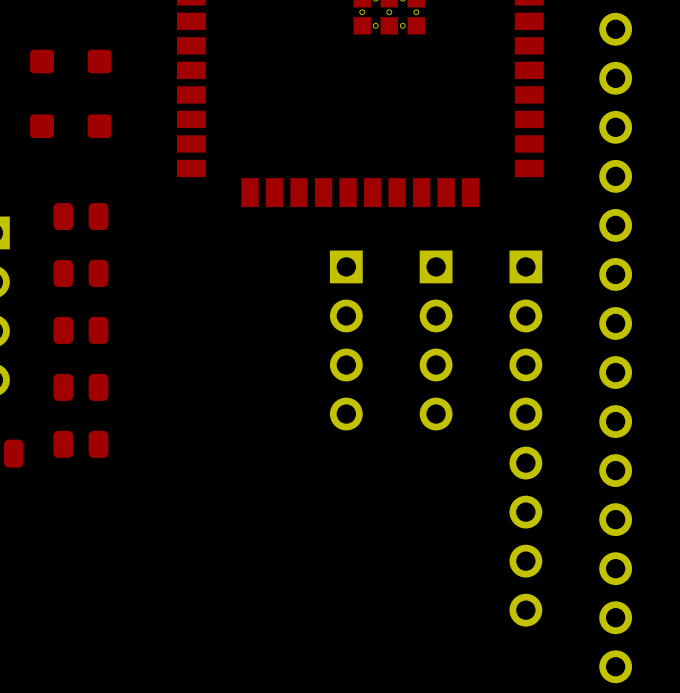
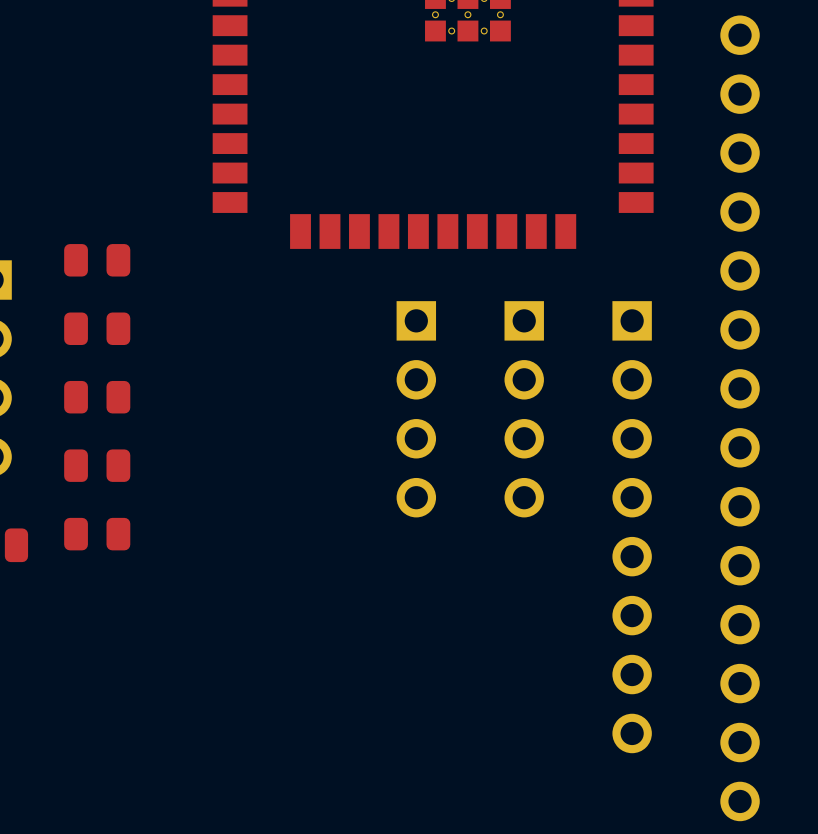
part: (70, 61) -> none
part: (70, 126) -> none

